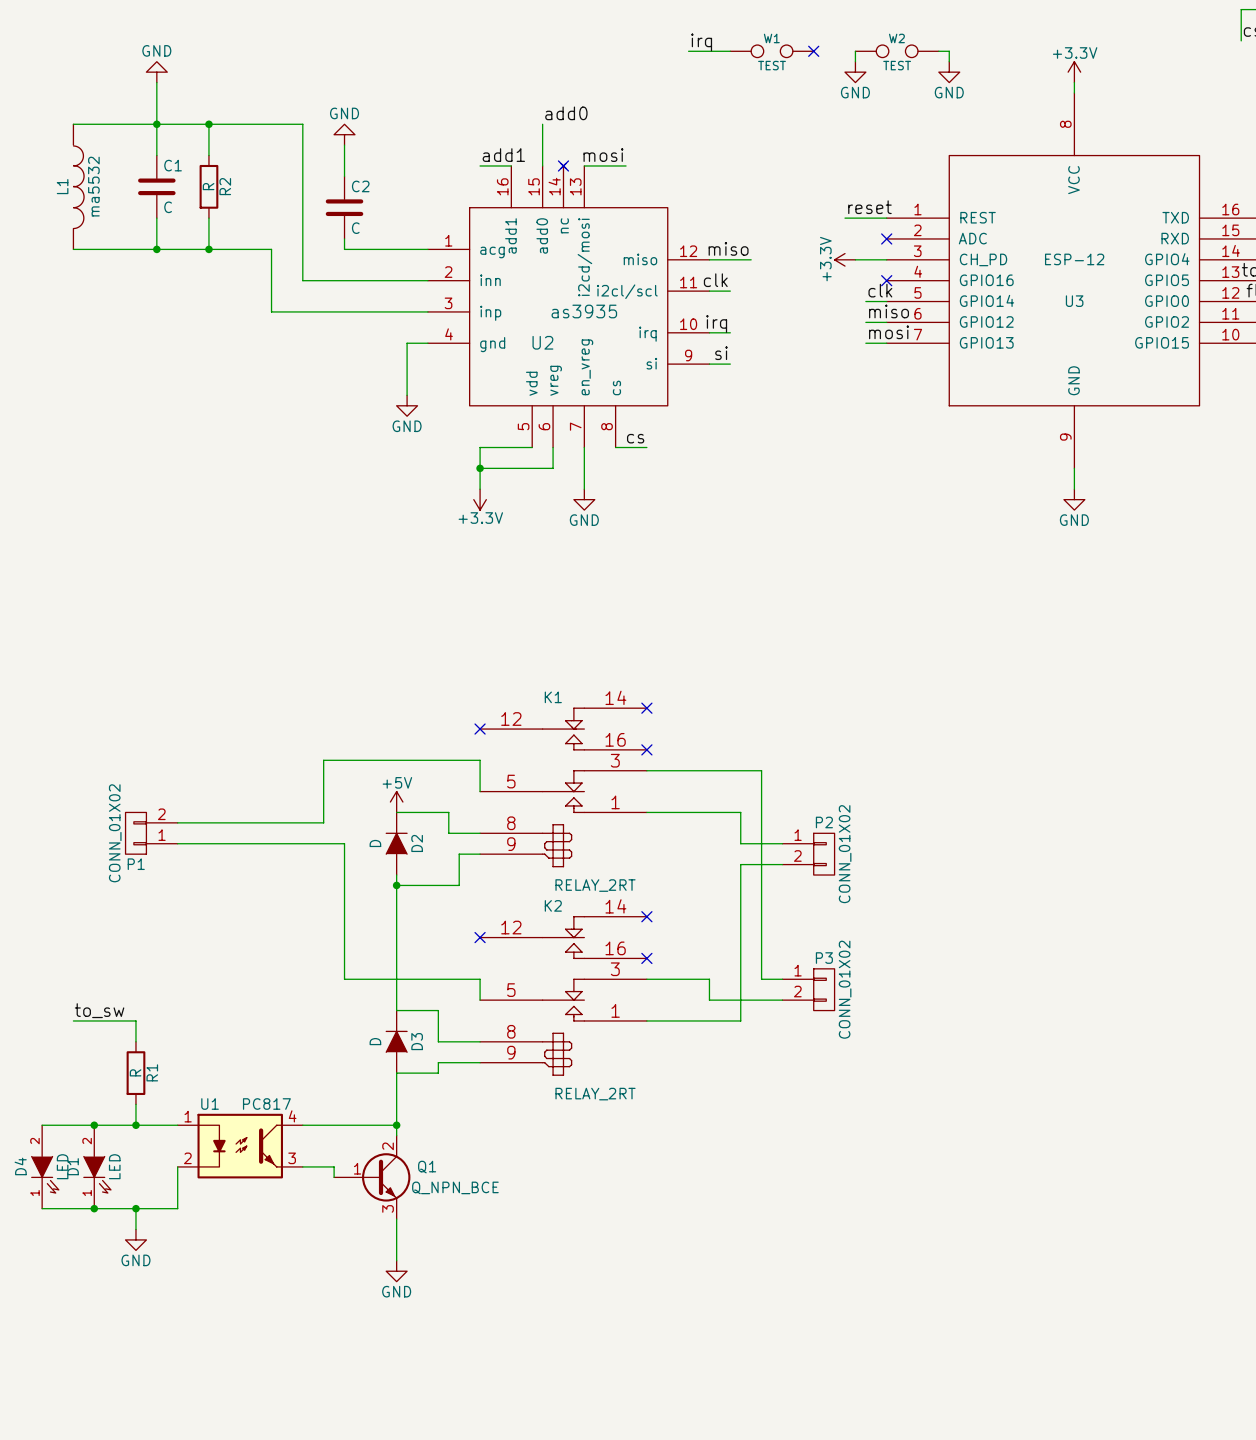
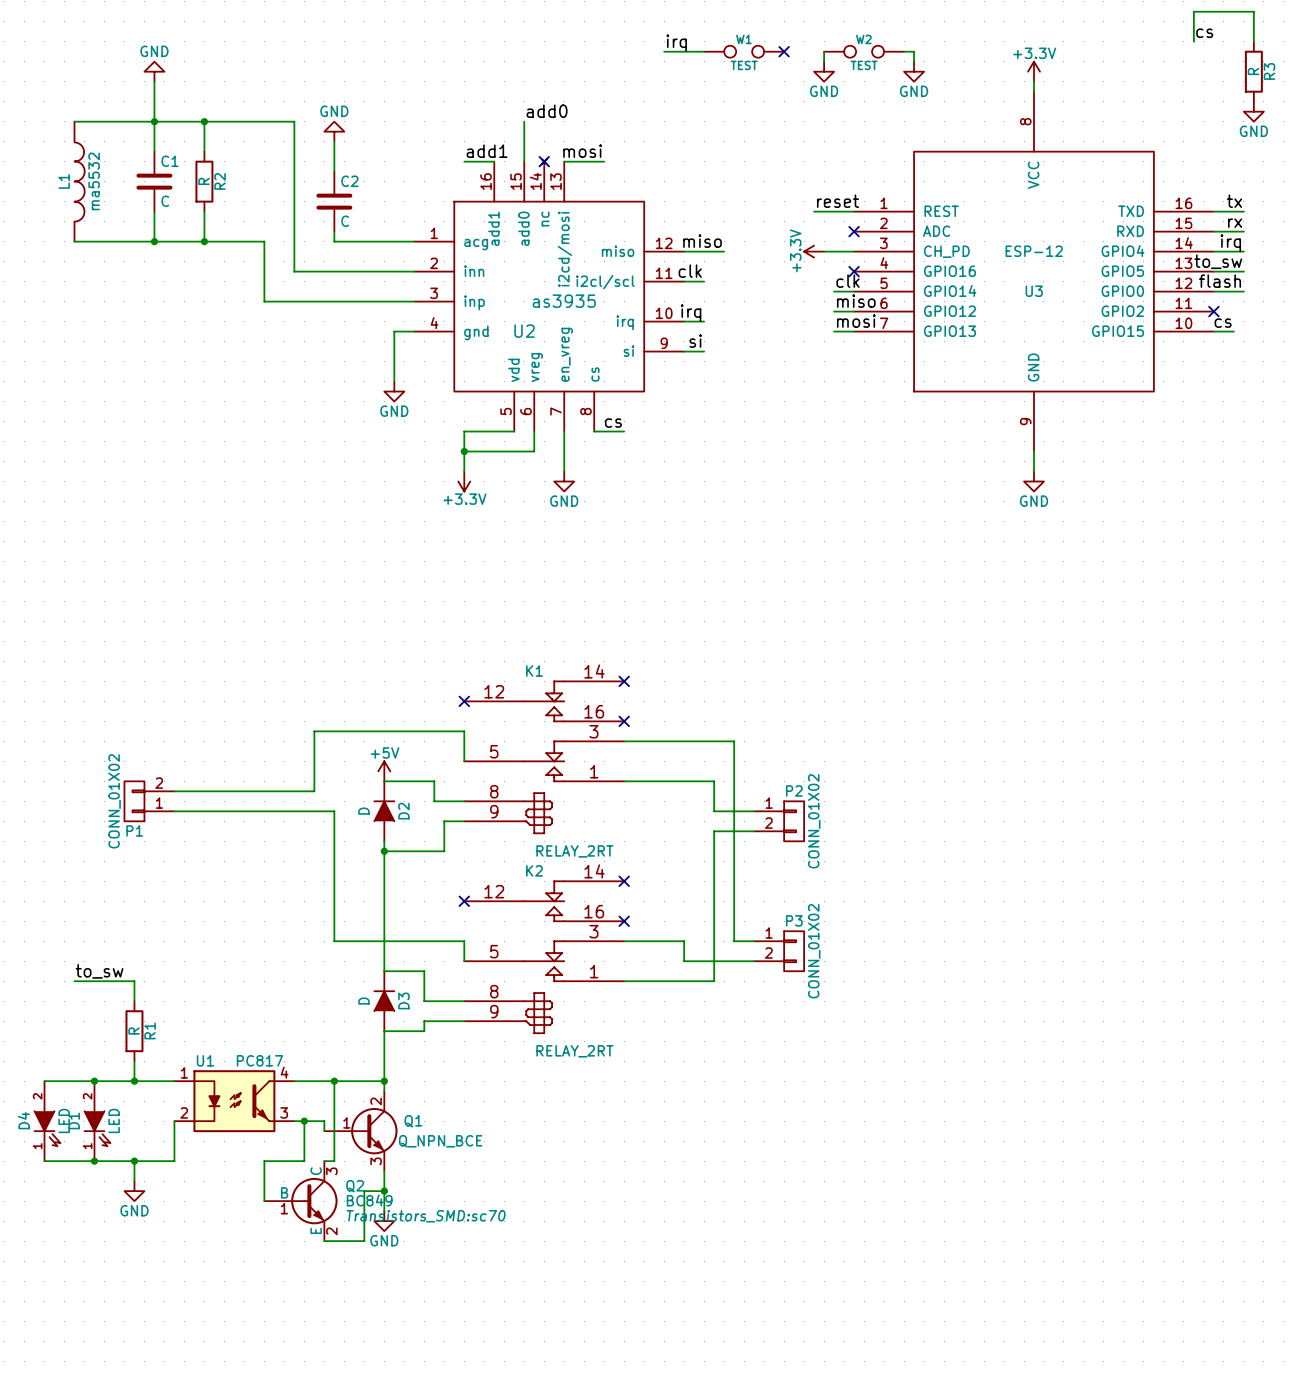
wire: none -> (334, 1081) (334, 1161) (324, 1161)
junction: none -> (334, 1081)
wire: none -> (304, 1121) (304, 1161) (264, 1161) (264, 1201)
junction: none -> (304, 1121)
wire: none -> (384, 1191) (364, 1191) (364, 1241) (324, 1241)
junction: none -> (384, 1191)
Q2: none -> BC849 (300, 1201)

